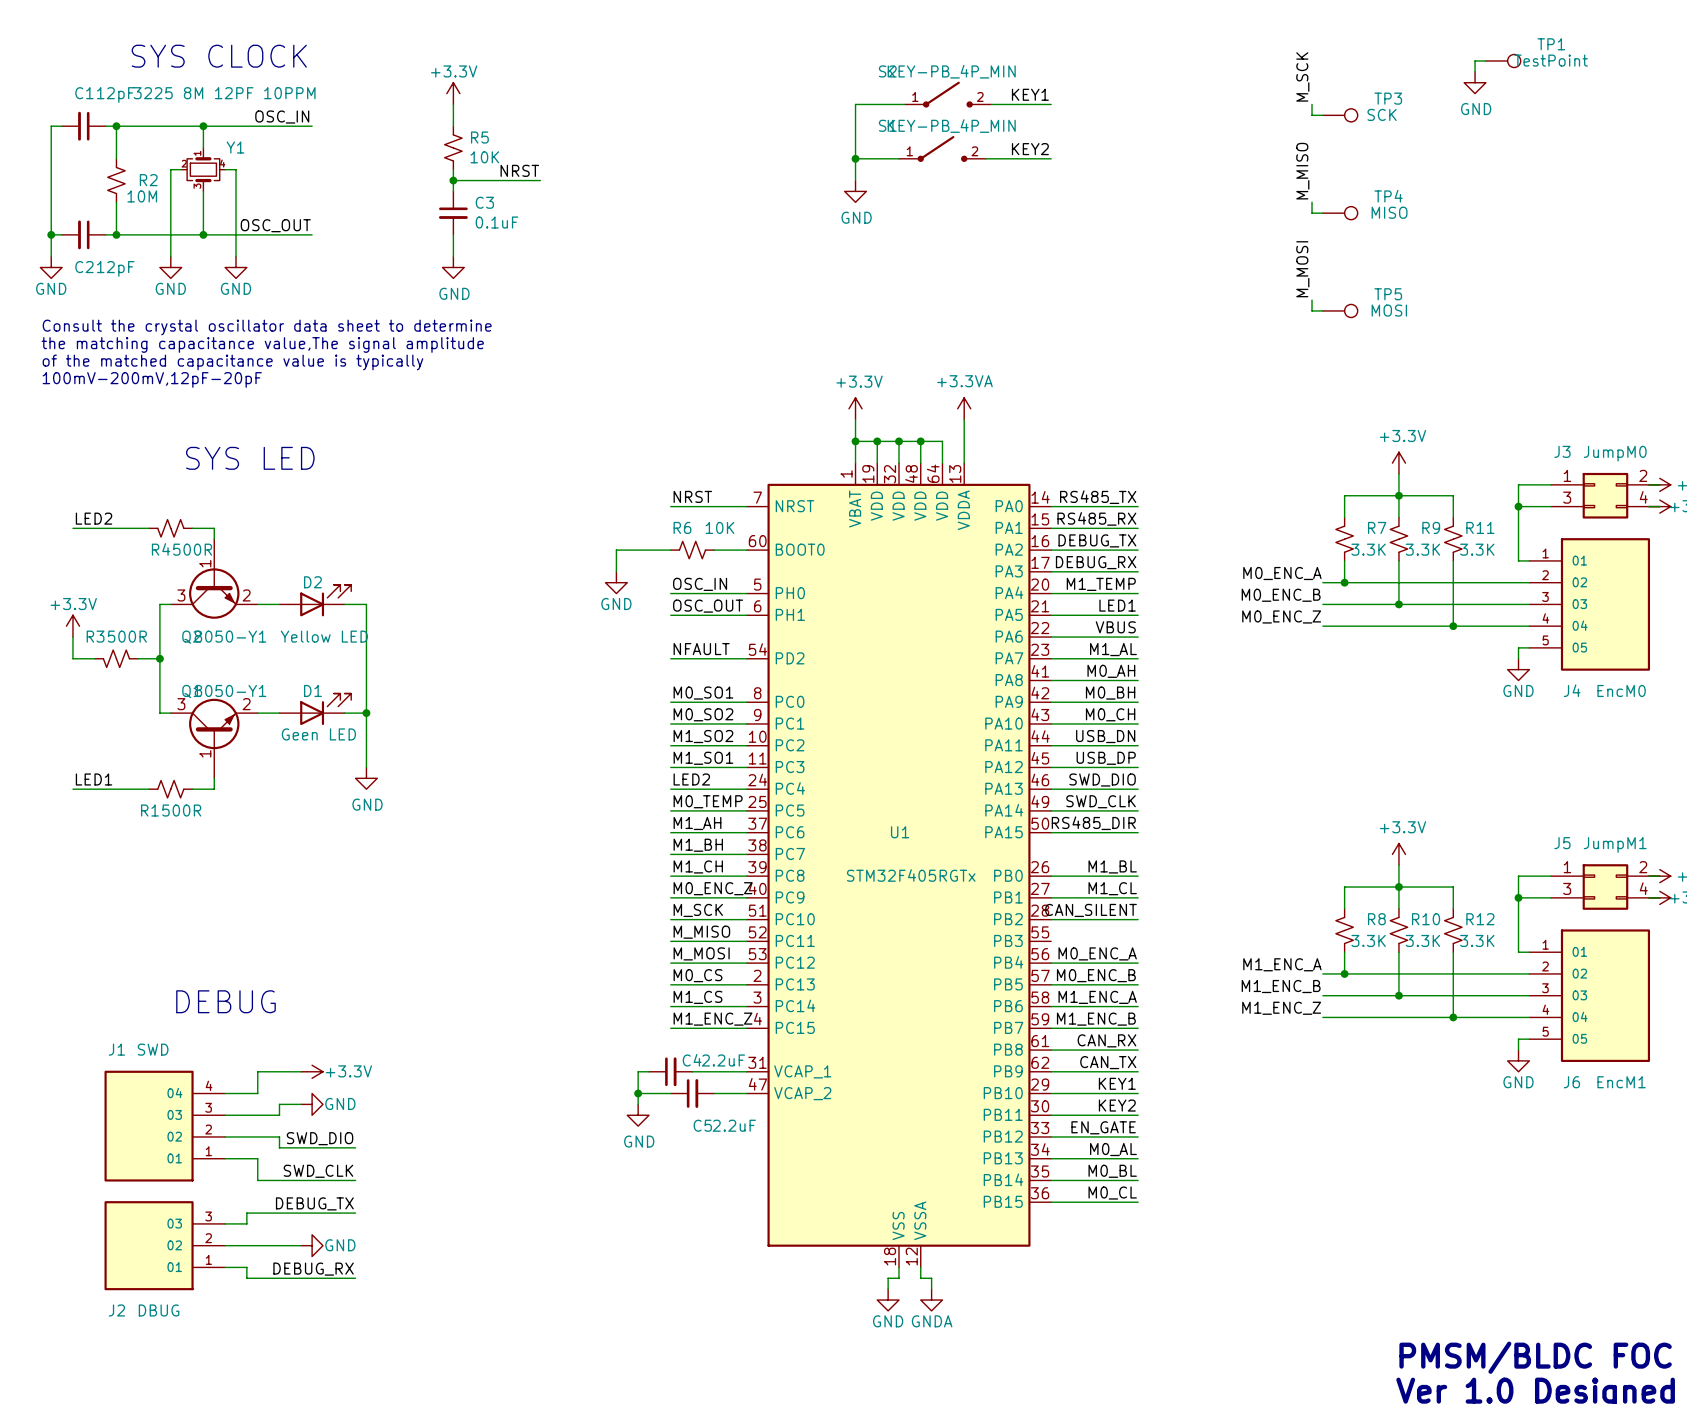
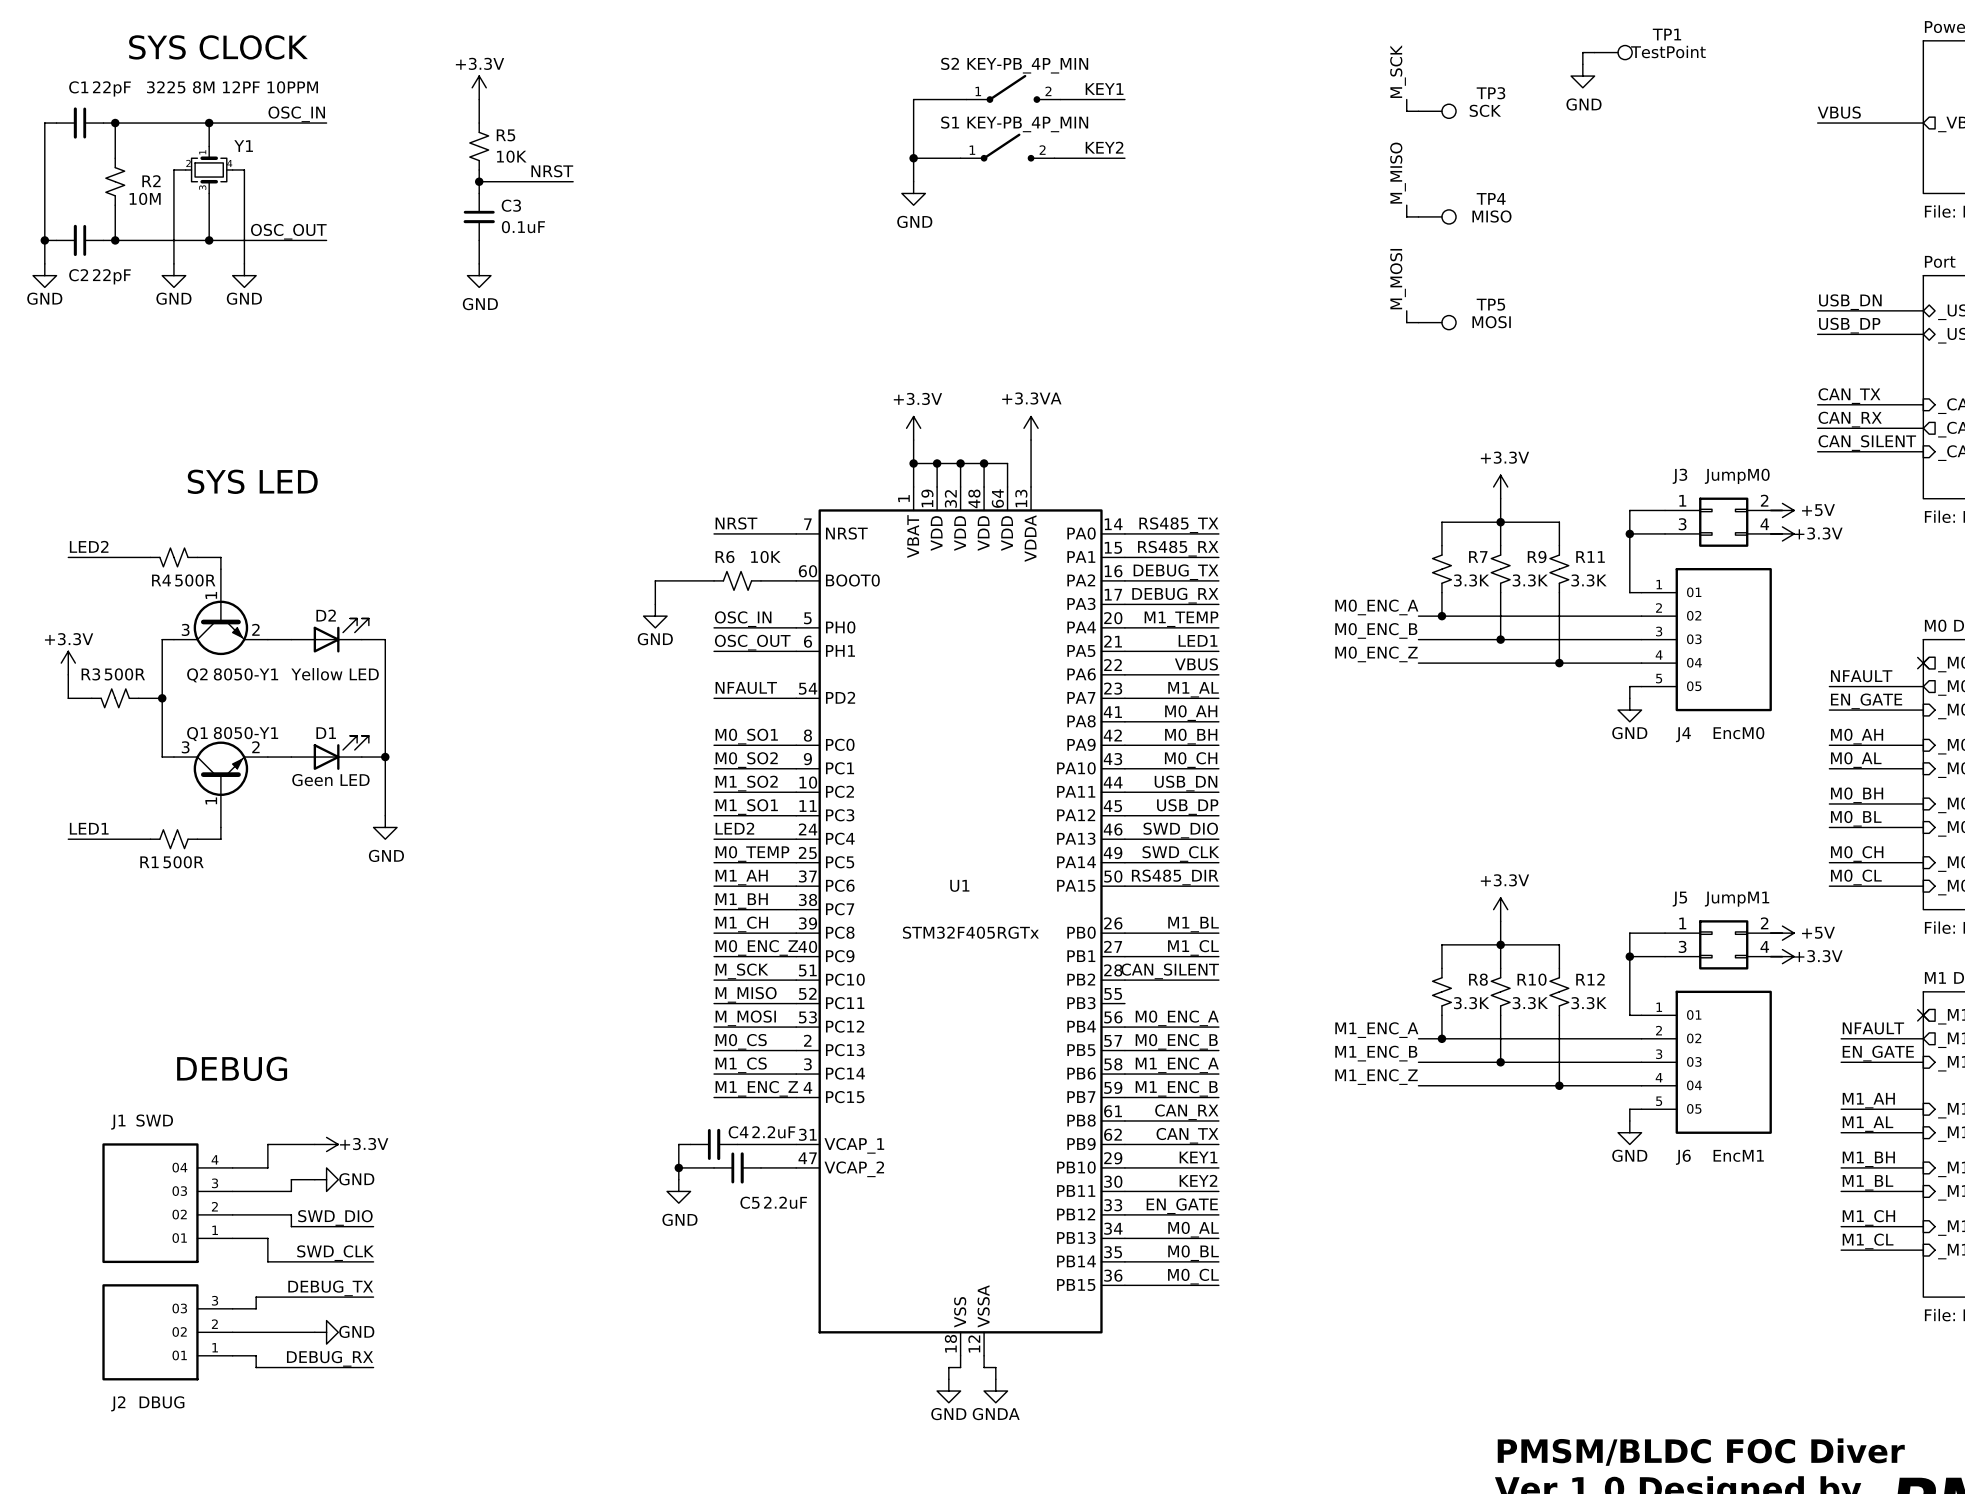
C1 value: 12pF (115, 95) -> 22pF (111, 88)
C2 value: 12pF (115, 268) -> 22pF (111, 276)
text: Consult the crystal oscillator data sheet to determine (267, 327) -> none
text: the matching capacitance value,The signal amplitude (262, 344) -> none
text: of the matched capacitance value is typically (232, 362) -> none
text: 100mV-200mV,12pF-20pF (152, 379) -> none

